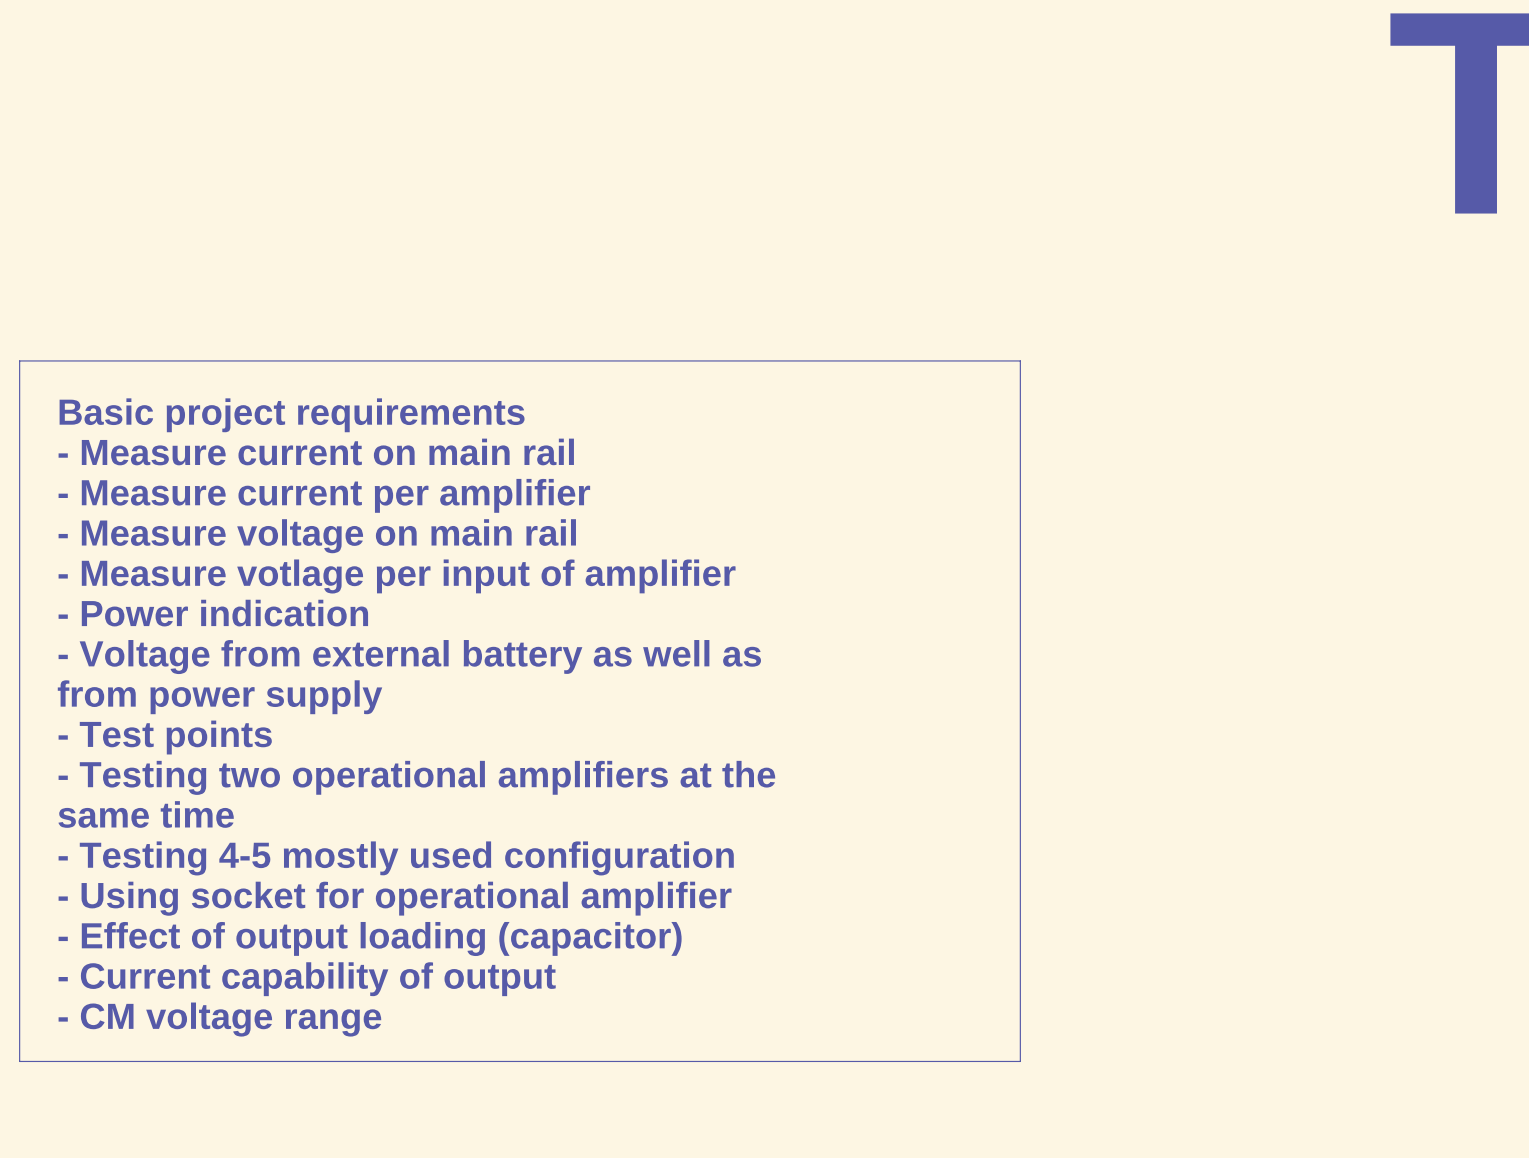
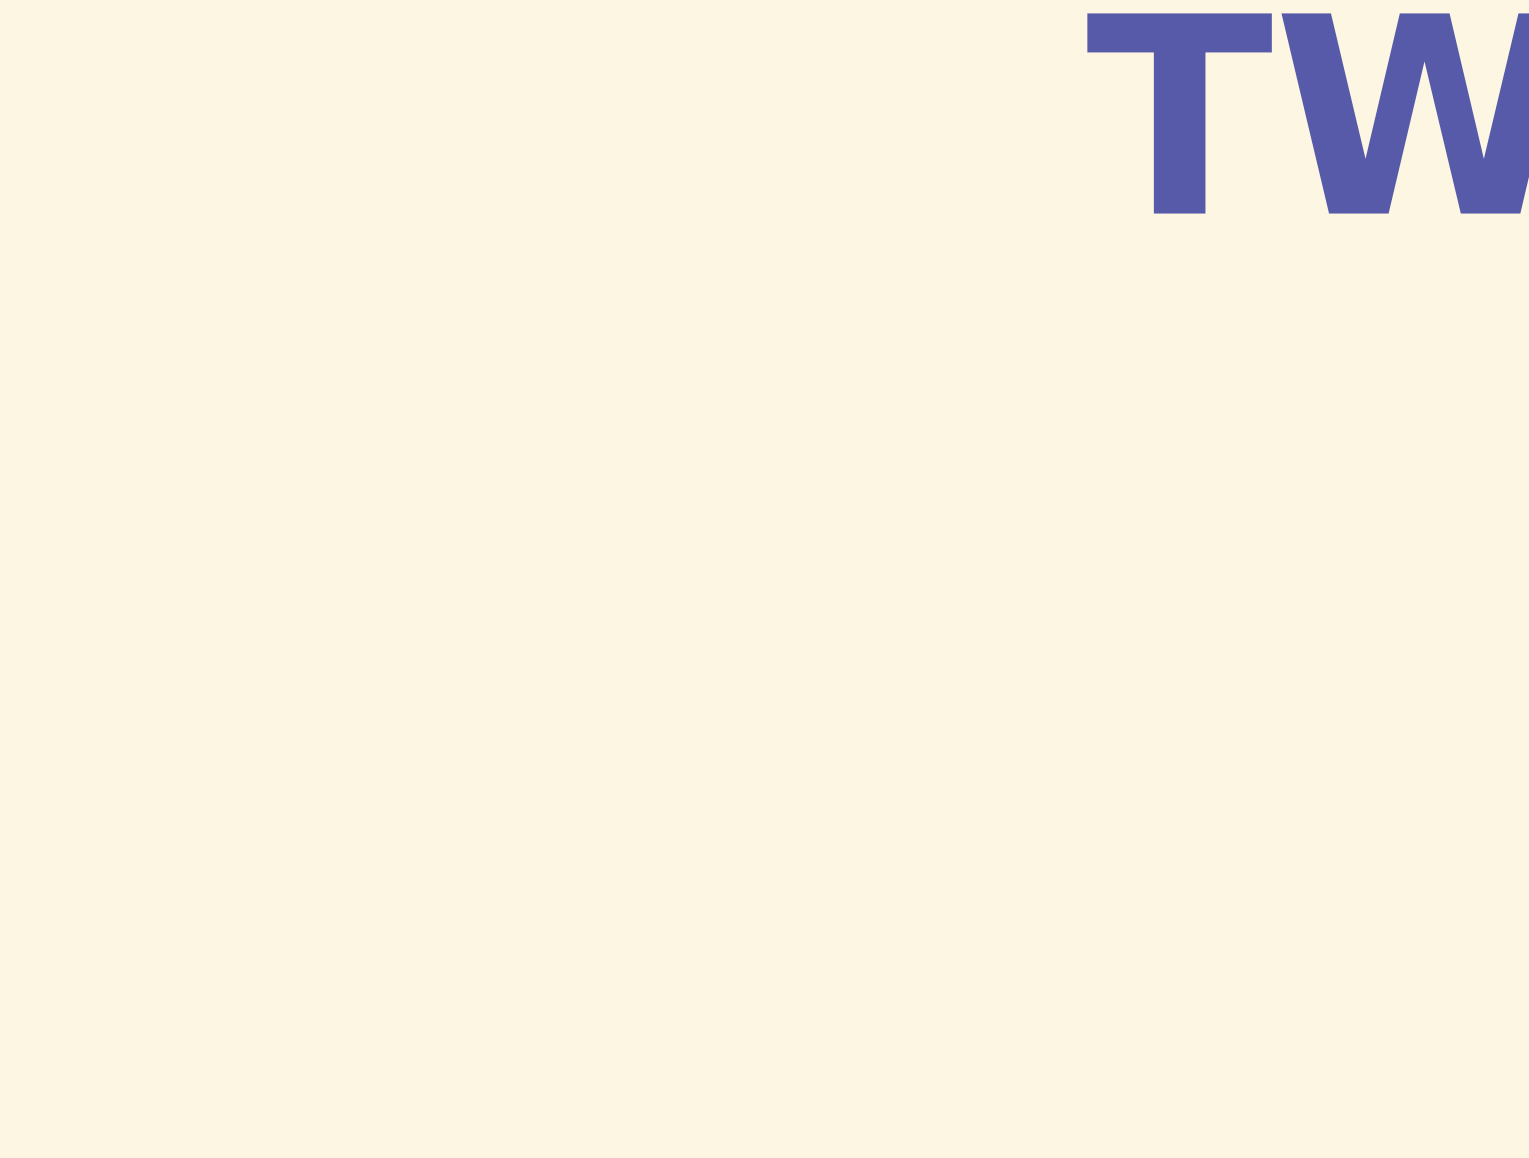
line: (19, 360) (1020, 360) (1020, 1061) (19, 1061) (19, 360) -> none
text: Basic project requirements (292, 415) -> none
text: - Measure current on main rail (316, 451) -> none
text: - Measure current per amplifier (324, 495) -> none
text: - Measure voltage on main rail (317, 536) -> none
text: - Measure votlage per input of amplifier (397, 576) -> none
text: - Power indication (213, 613) -> none
text: - Voltage from external battery as well as (409, 657) -> none
text: from power supply (220, 697) -> none
text: - Test points (165, 737) -> none
text: - Testing two operational amplifiers at the (416, 777) -> none
text: same time (146, 814) -> none
text: - Testing 4-5 mostly used configuration (396, 858) -> none
text: - Using socket for operational amplifier (395, 898) -> none
text: - Effect of output loading (capacitor) (370, 938) -> none
text: - Current capability of output (307, 979) -> none
text: - CM voltage range (219, 1019) -> none

